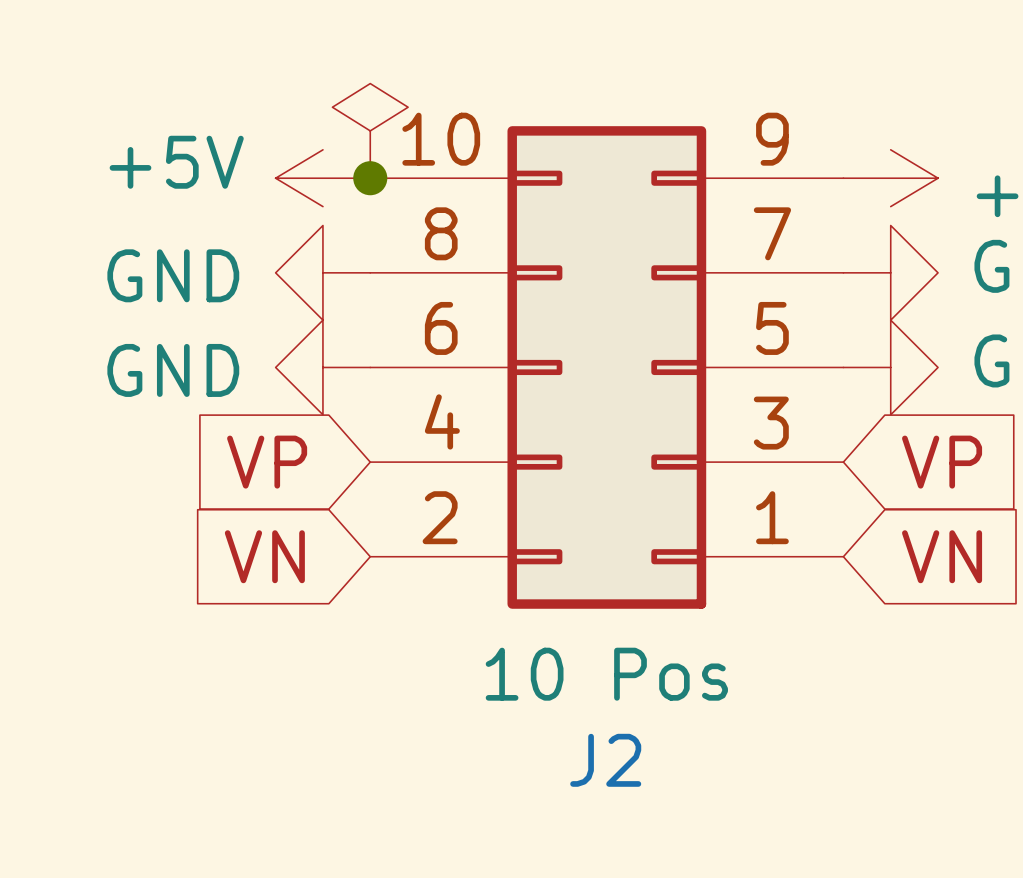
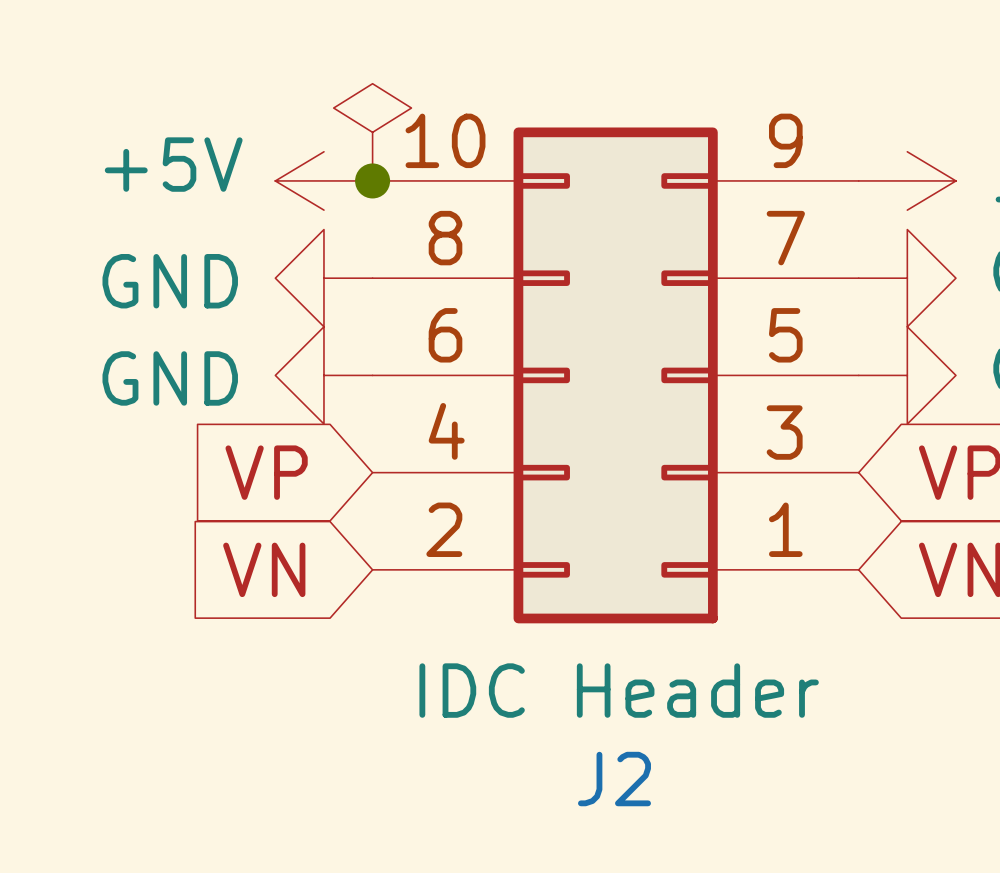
J2 value: 10 Pos (606, 674) -> IDC Header (619, 690)

